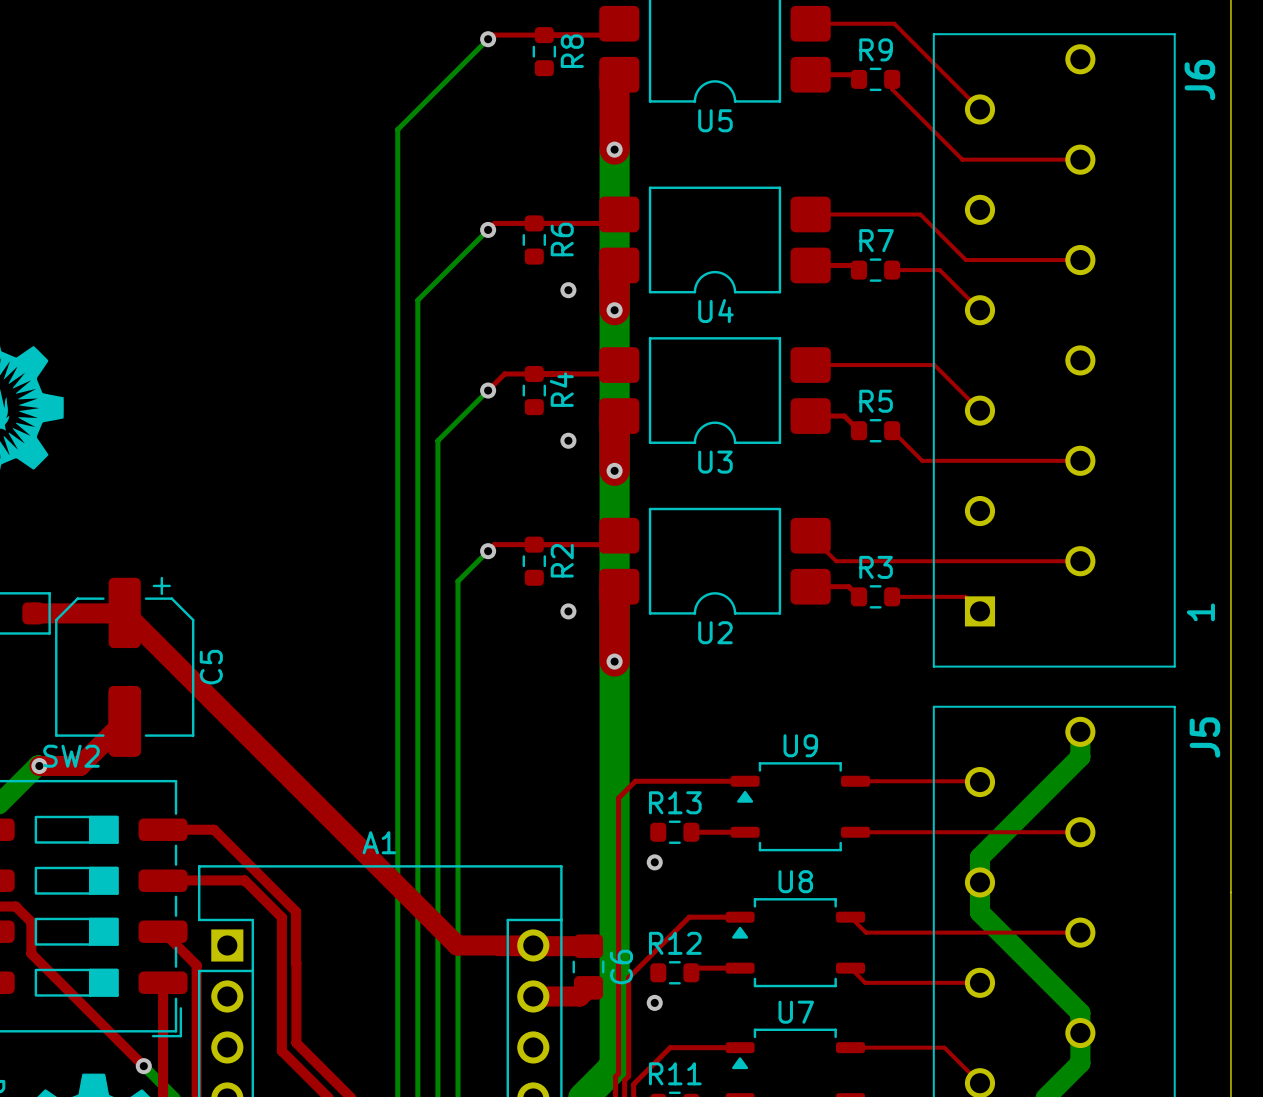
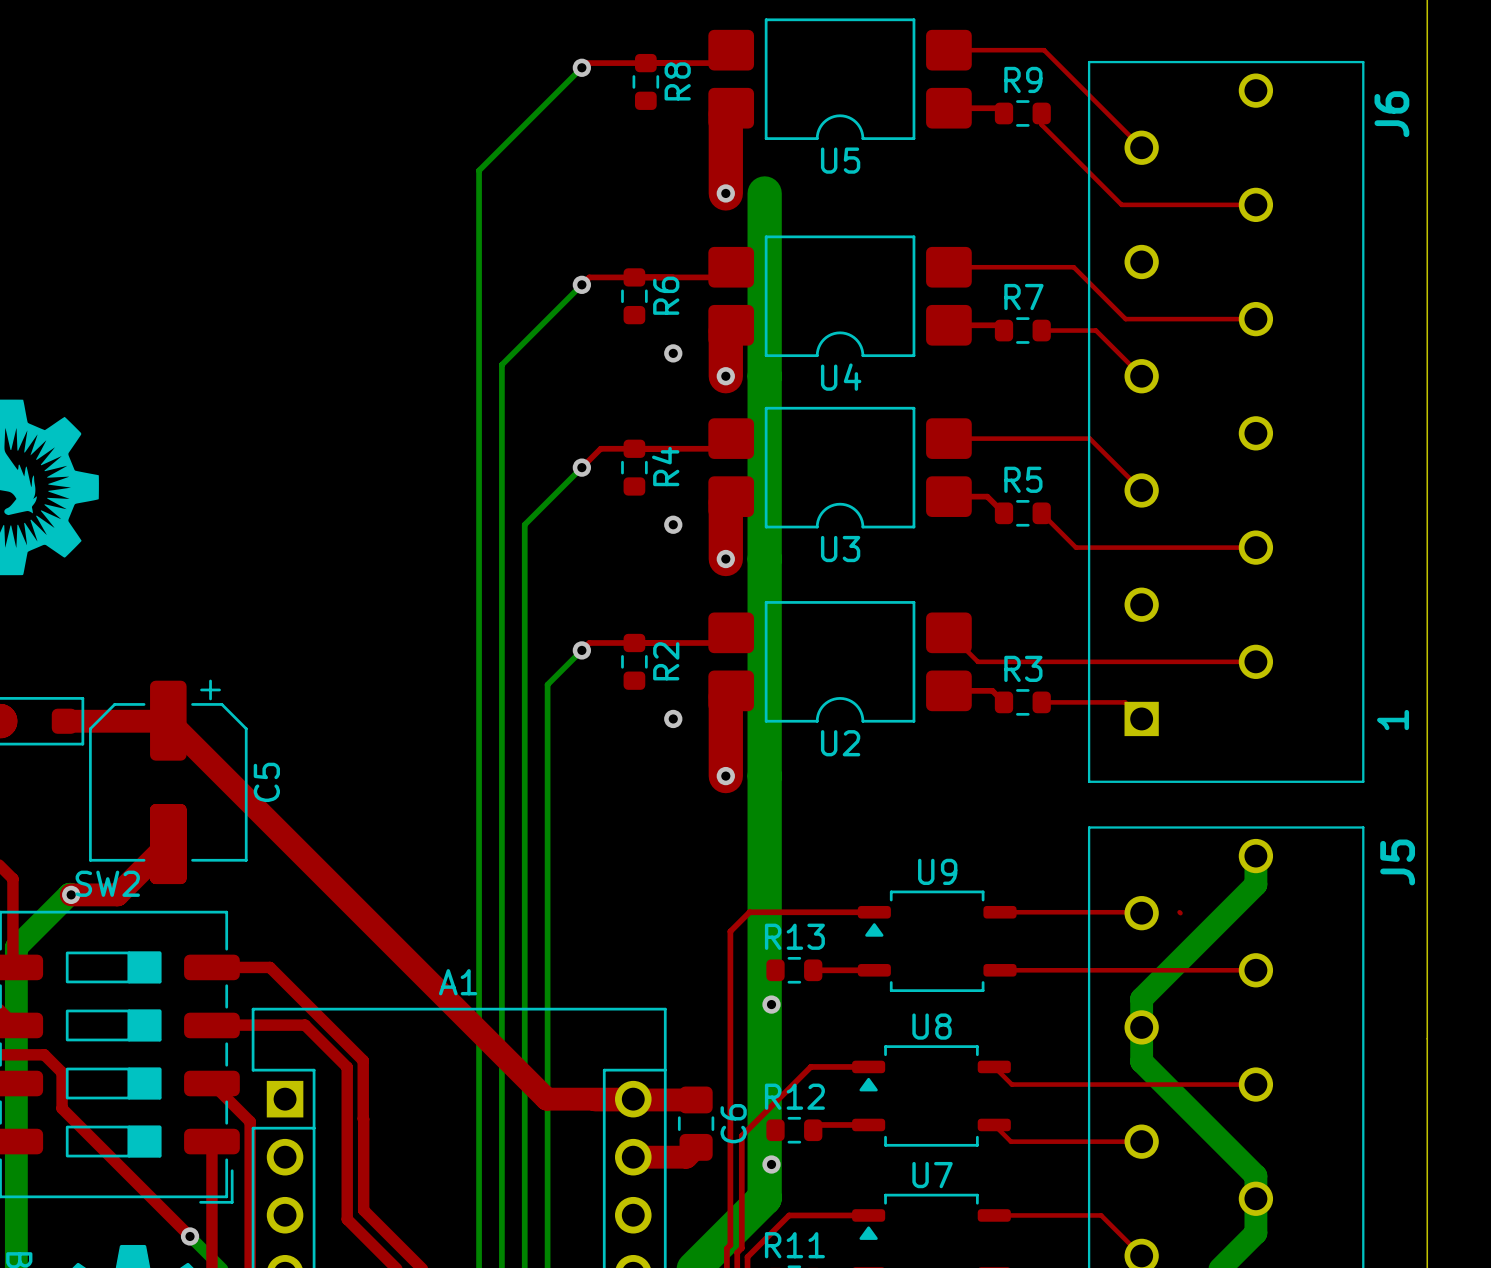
bottom track: (614, 149) (614, 1066) -> (764, 193) (764, 1198) (725, 1236)
top track: none -> (1179, 912) (1180, 913)

